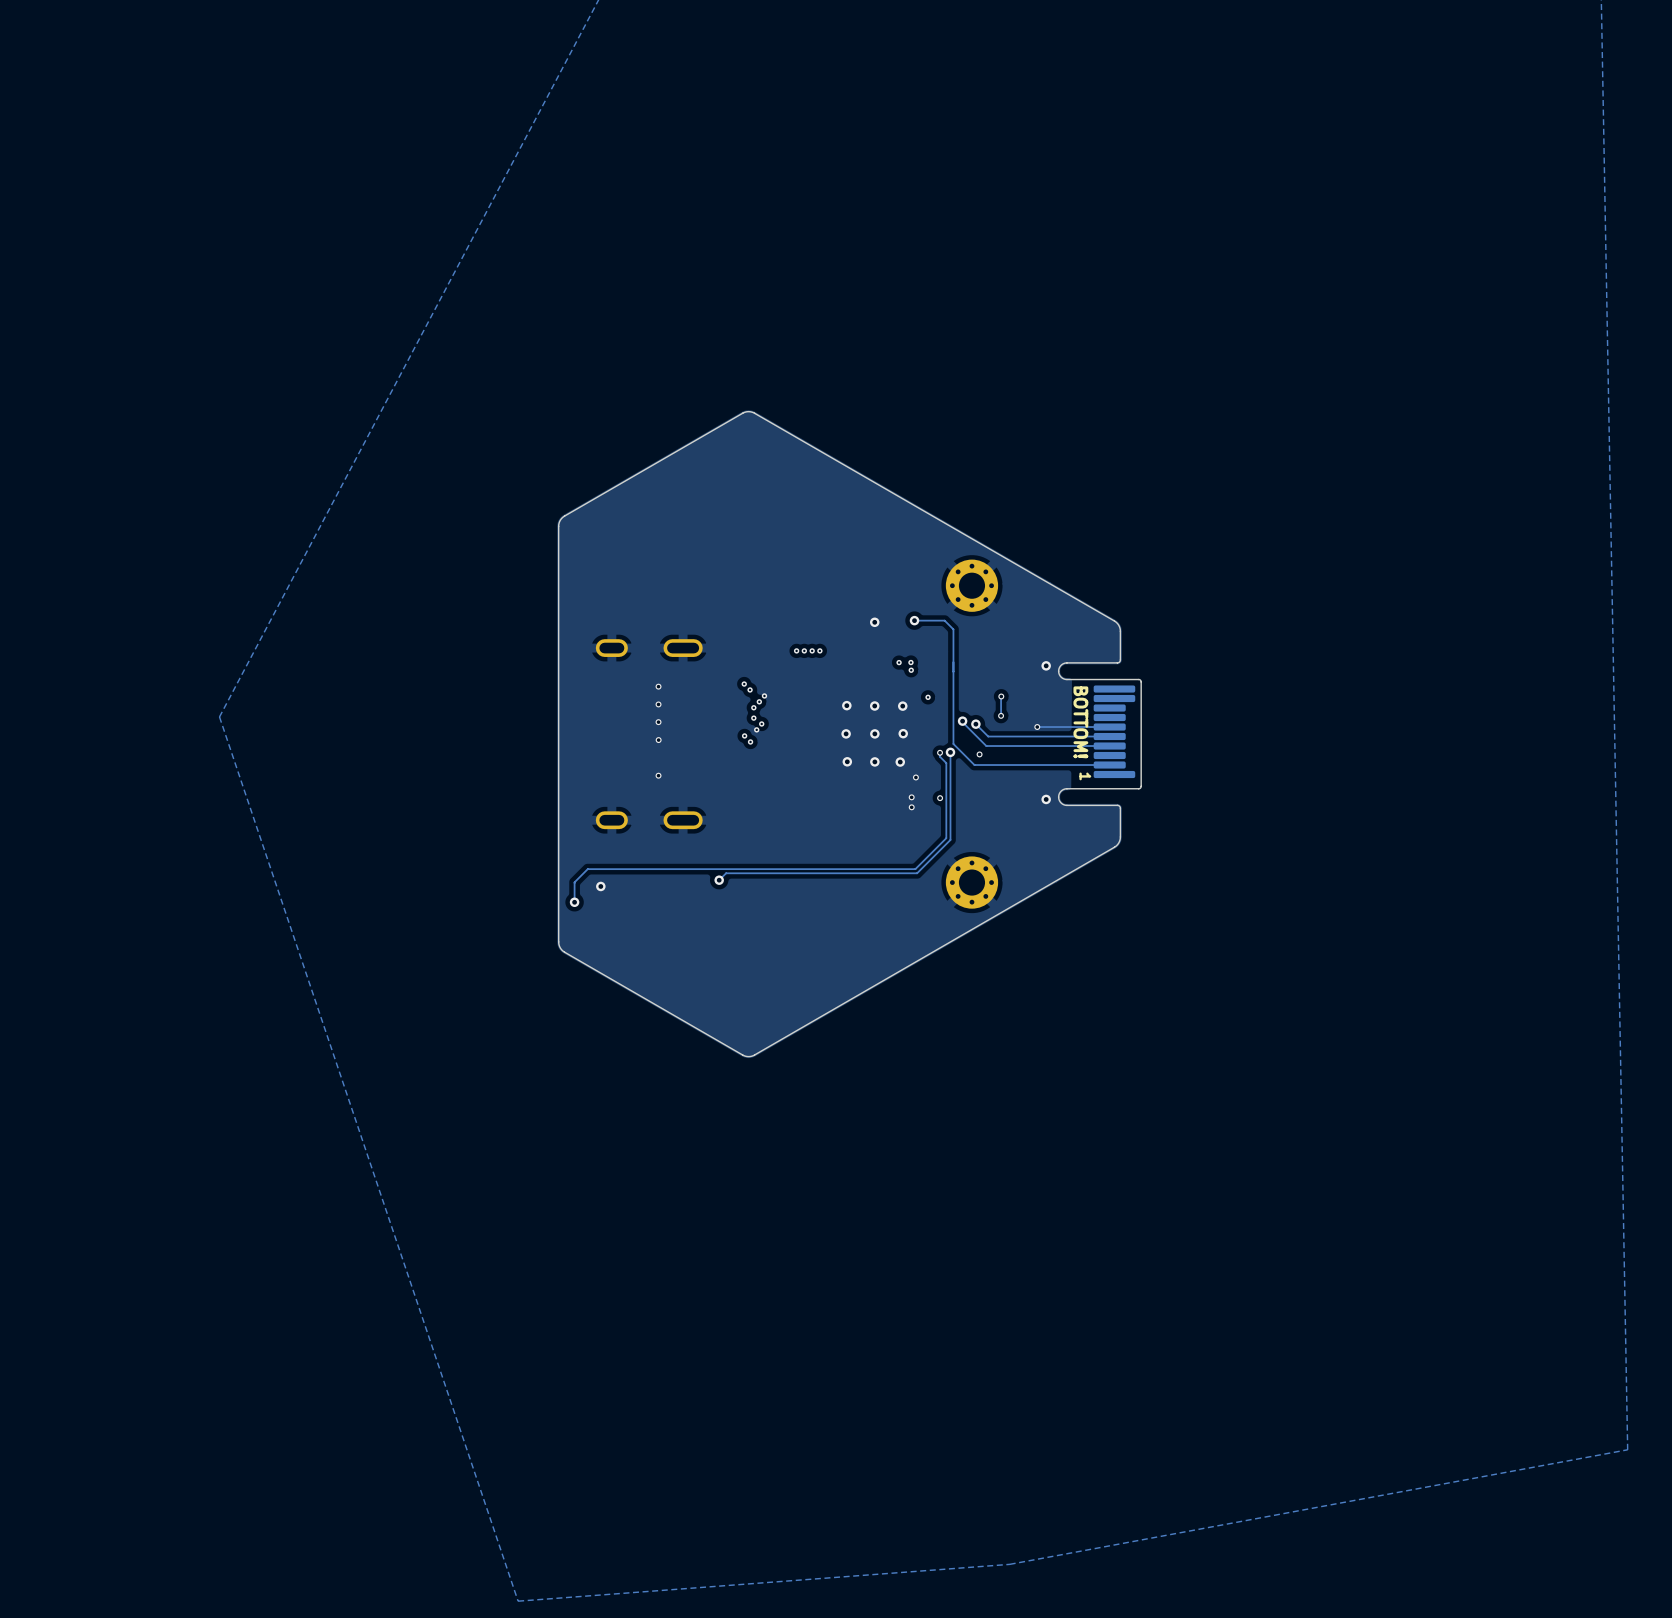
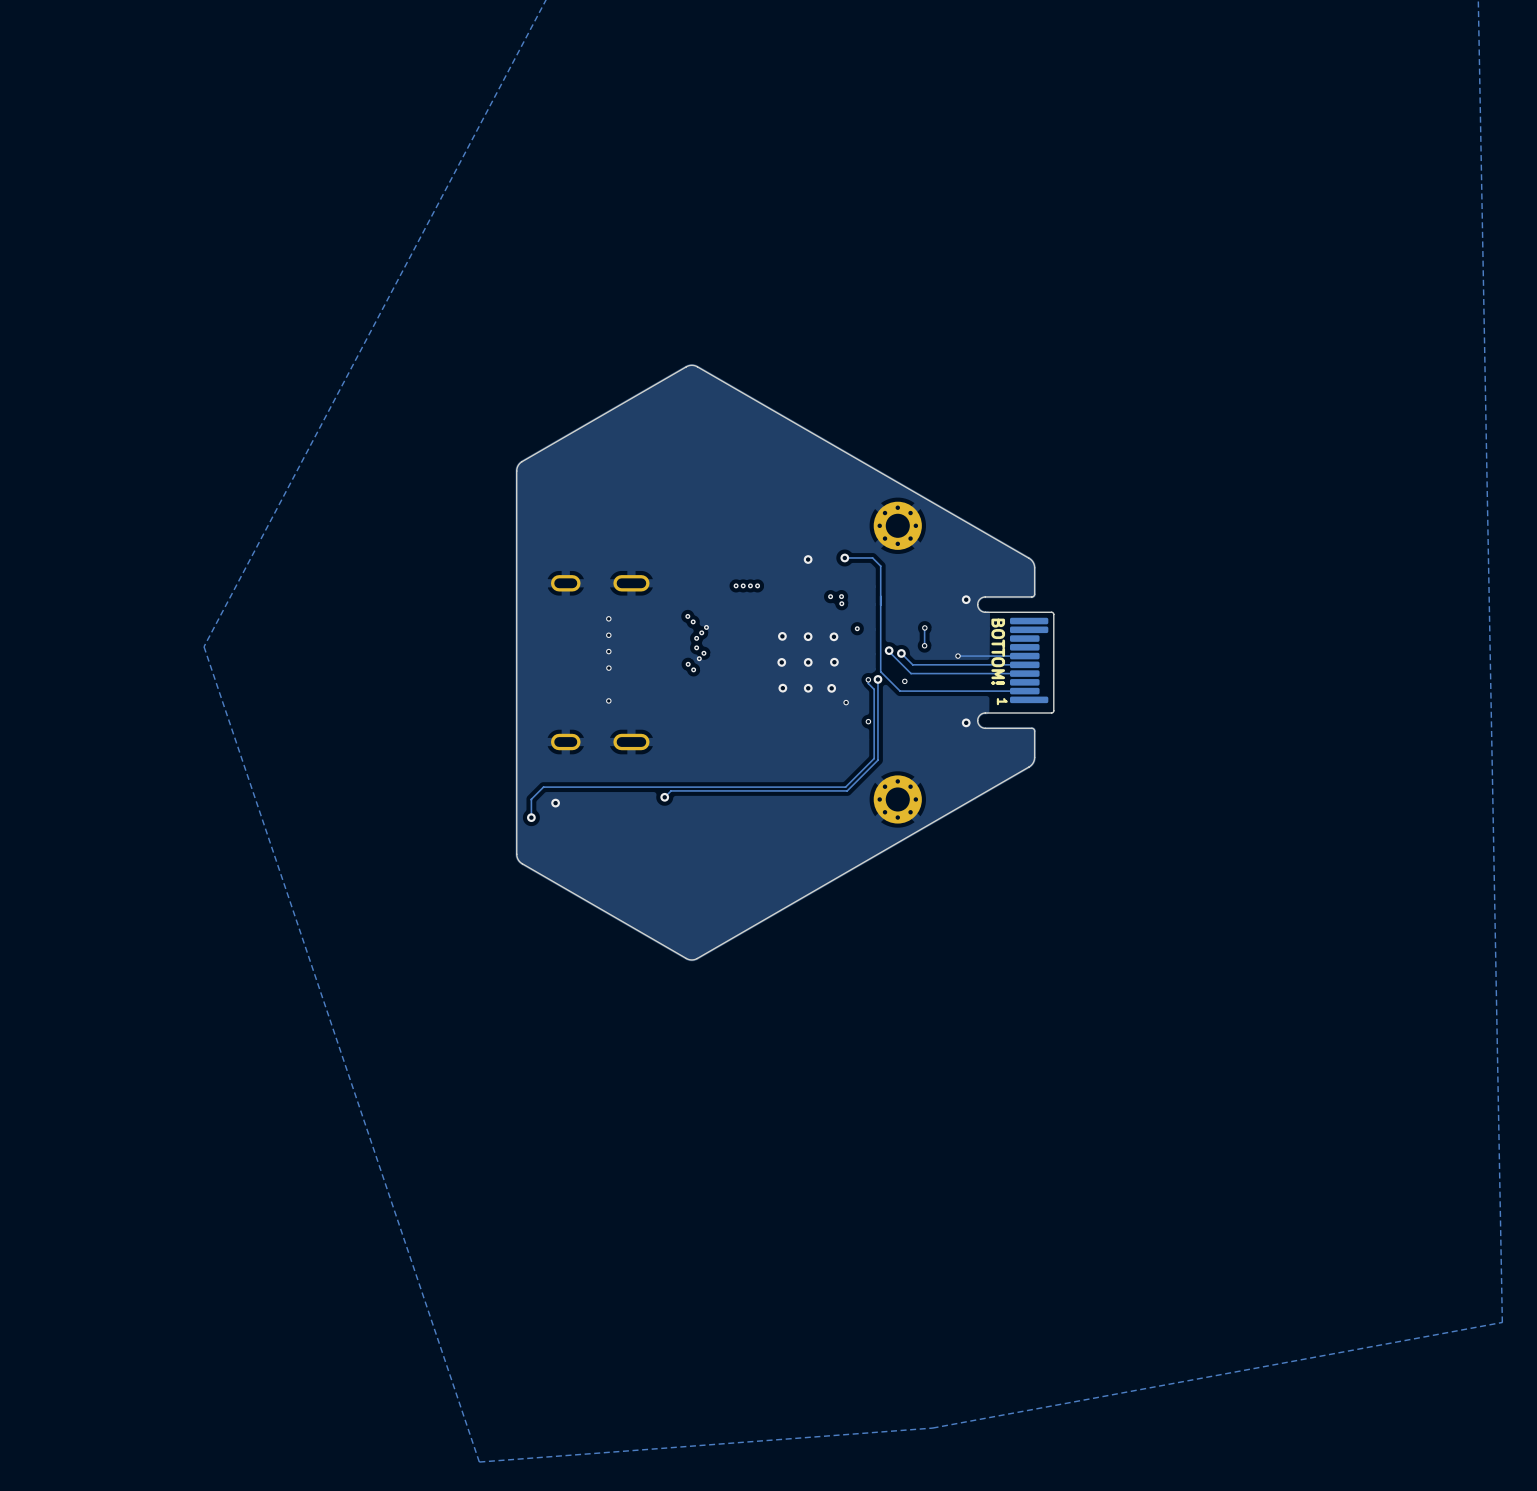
via: (911, 797) -> none
via: (911, 807) -> none

